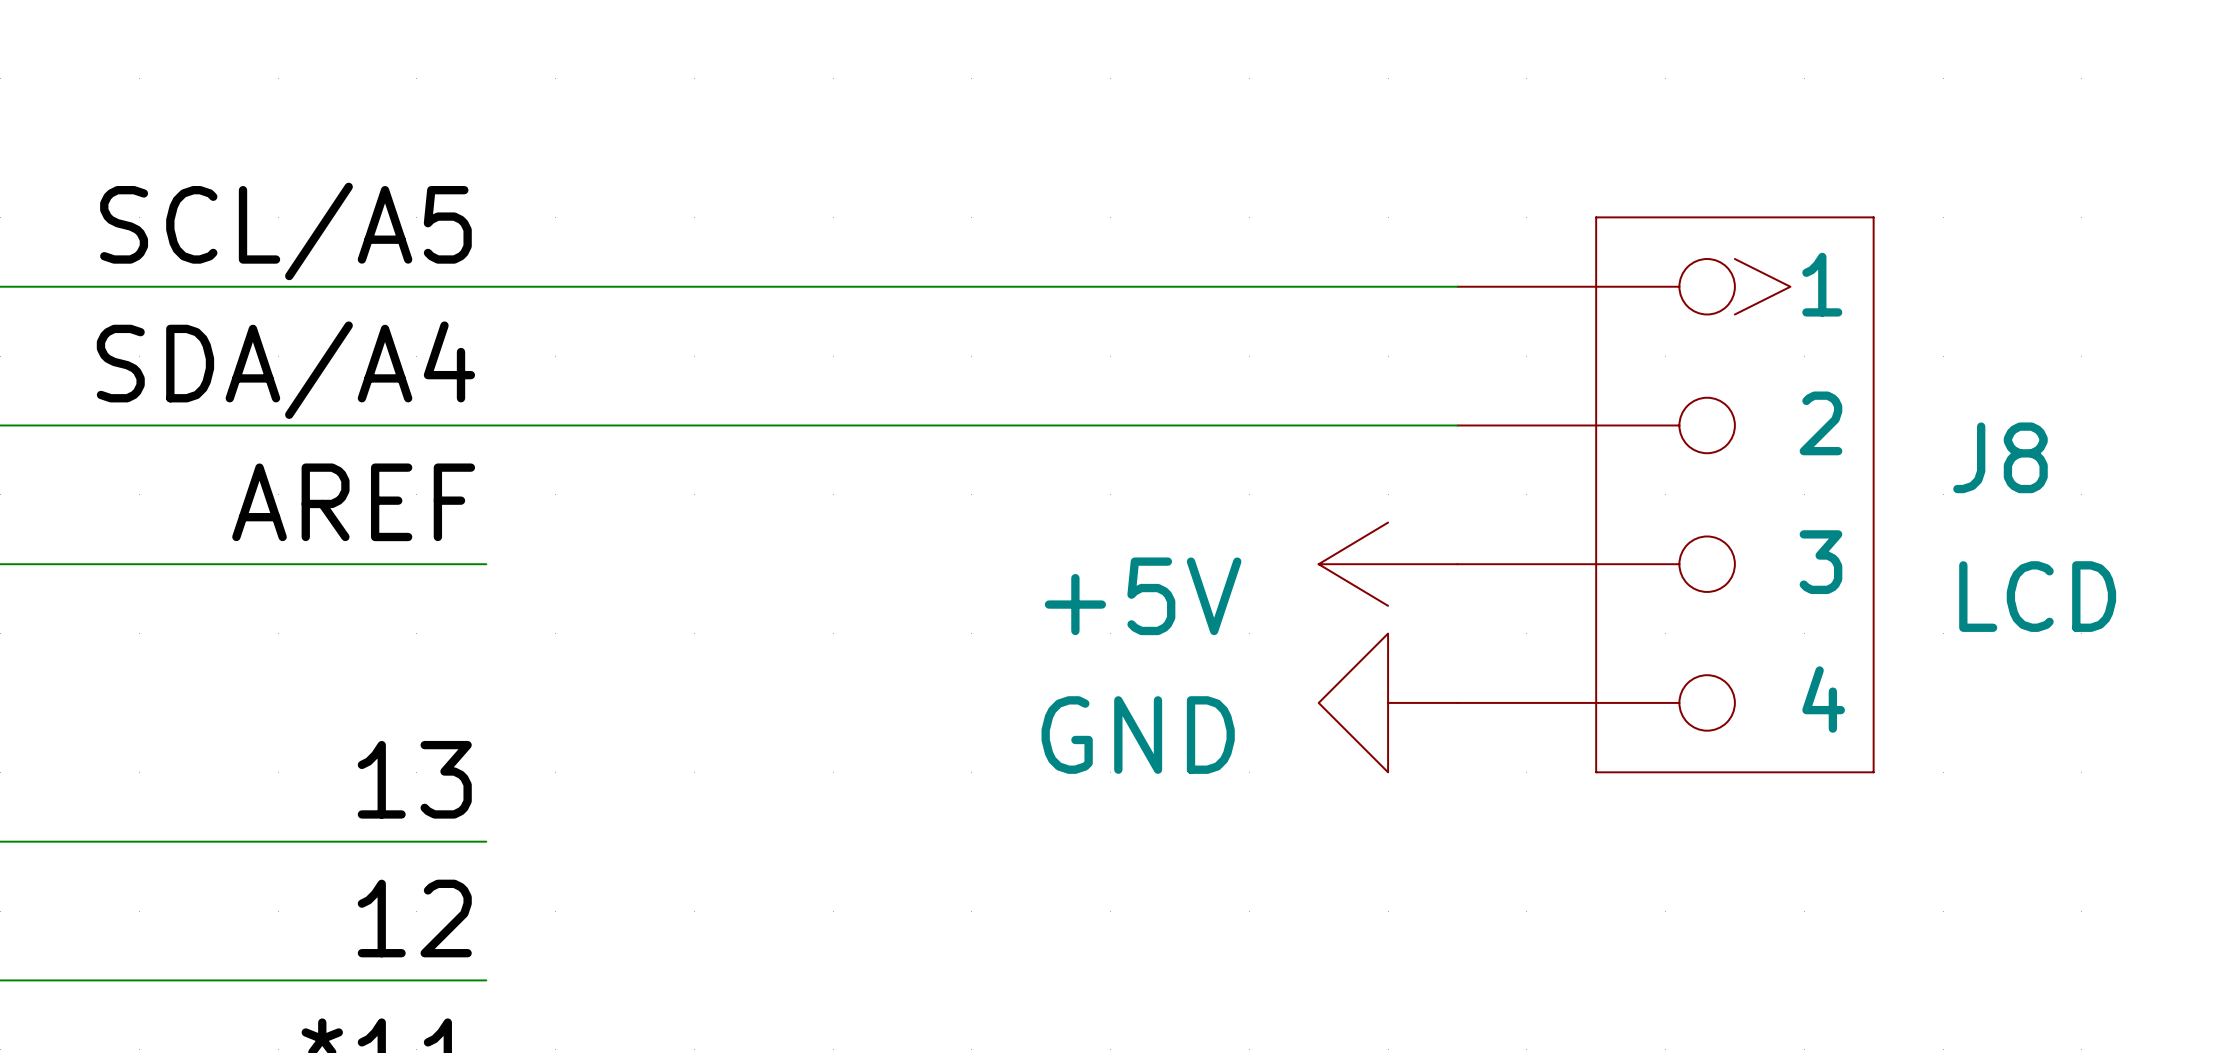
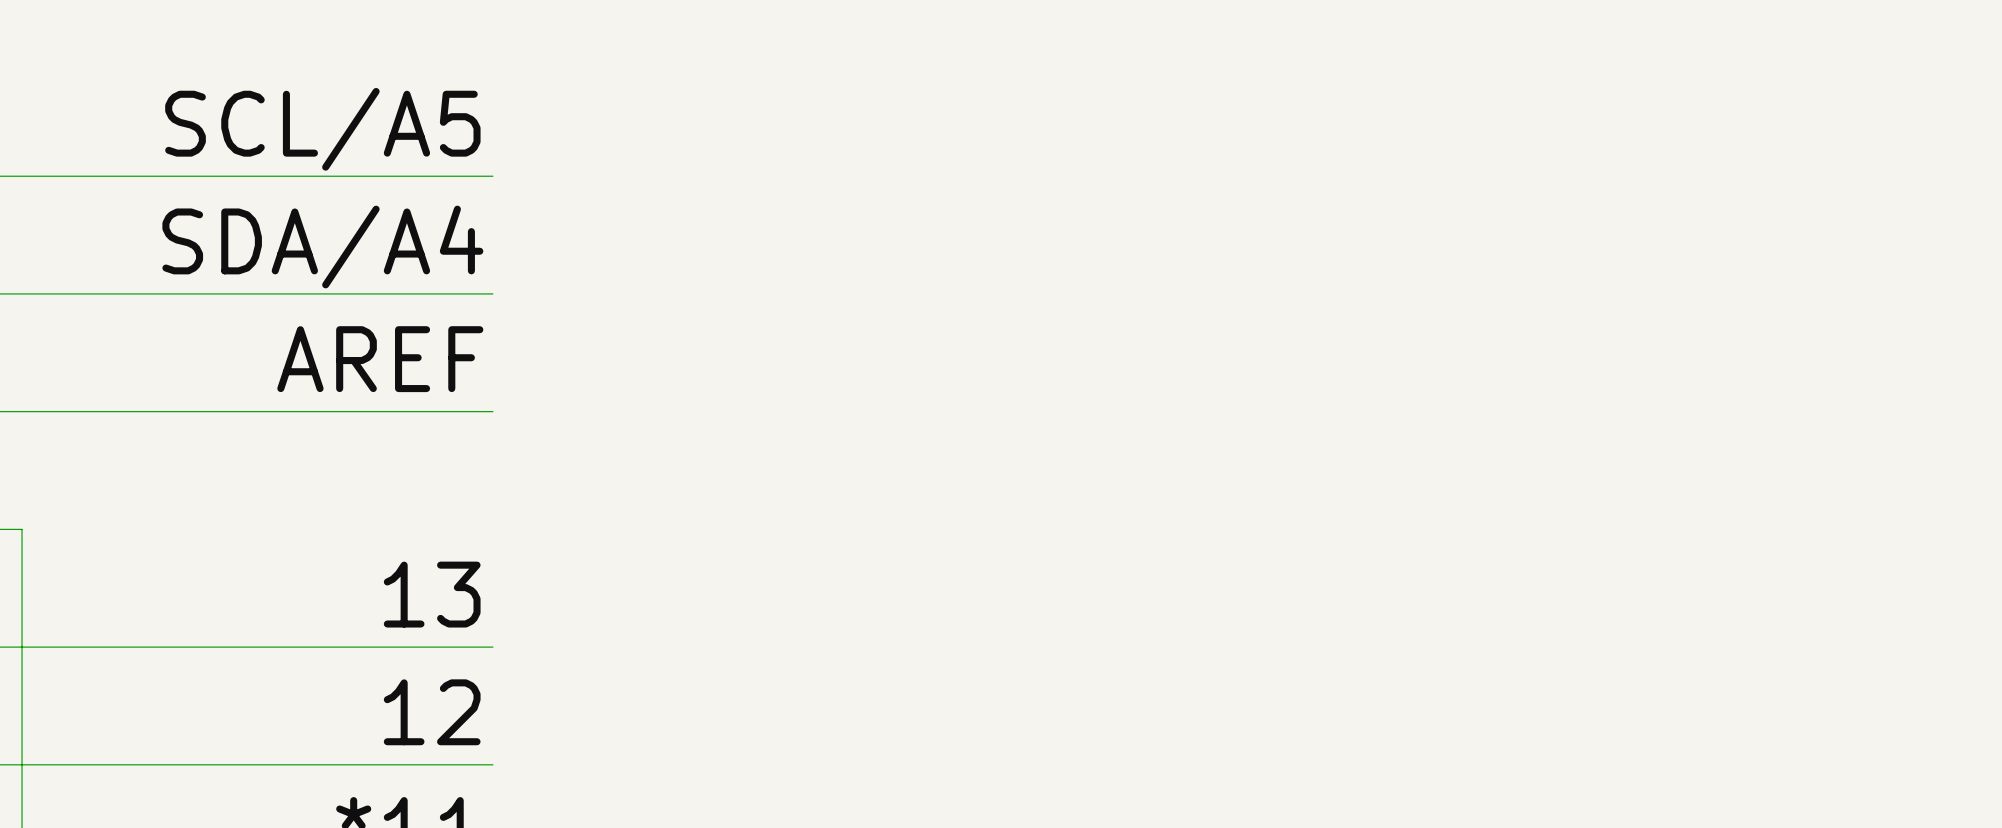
wire: (486, 286) (1457, 286) -> none
wire: (486, 425) (1457, 425) -> none
J8: LCD (1665, 494) -> none
power symbol: +5V (1388, 564) -> none
power symbol: GND (1388, 702) -> none

